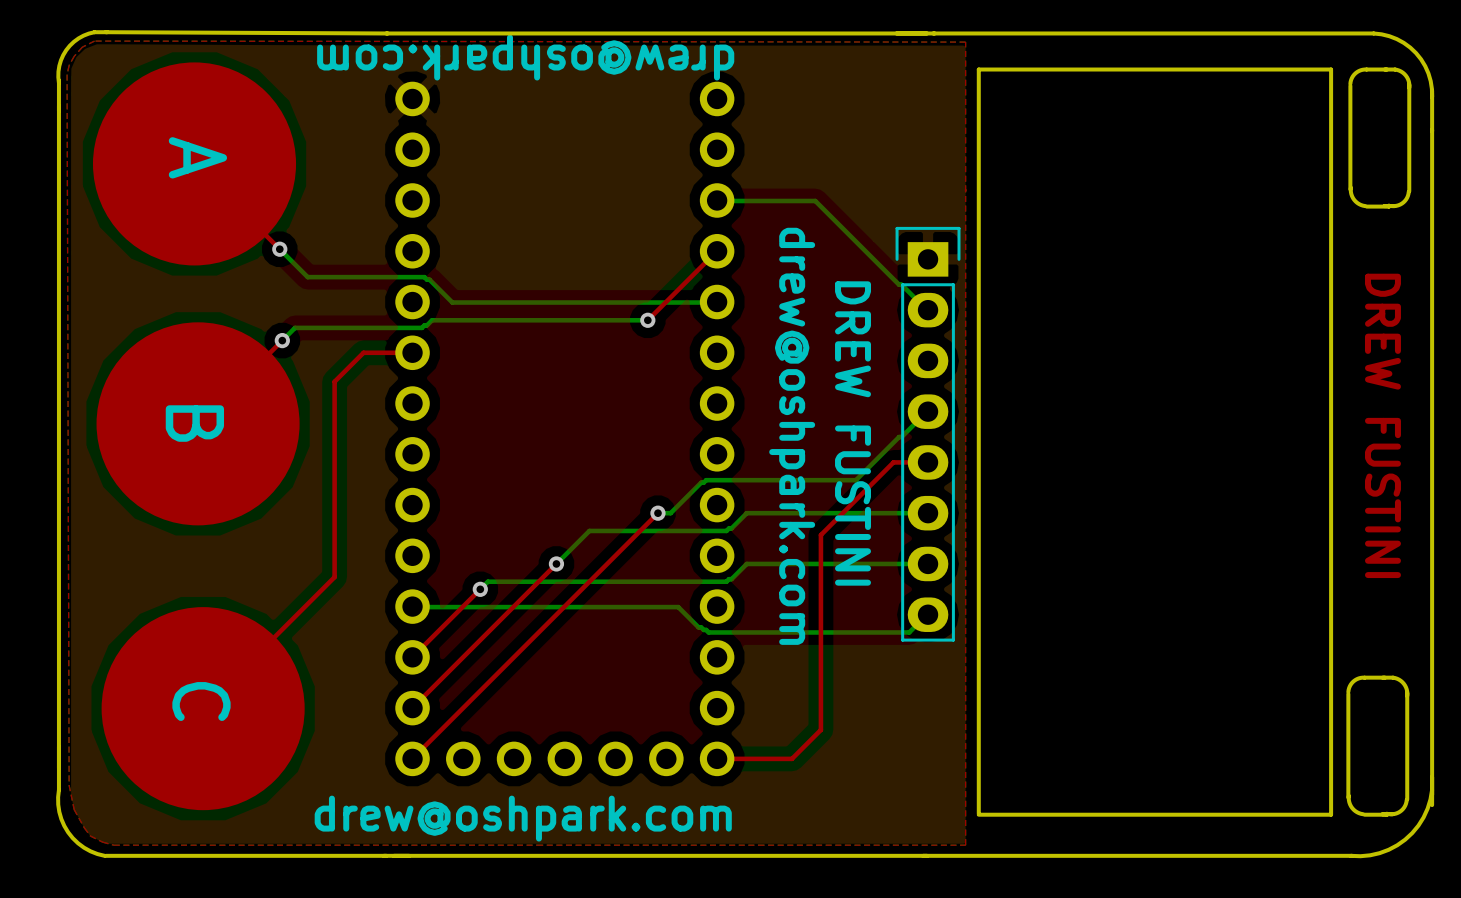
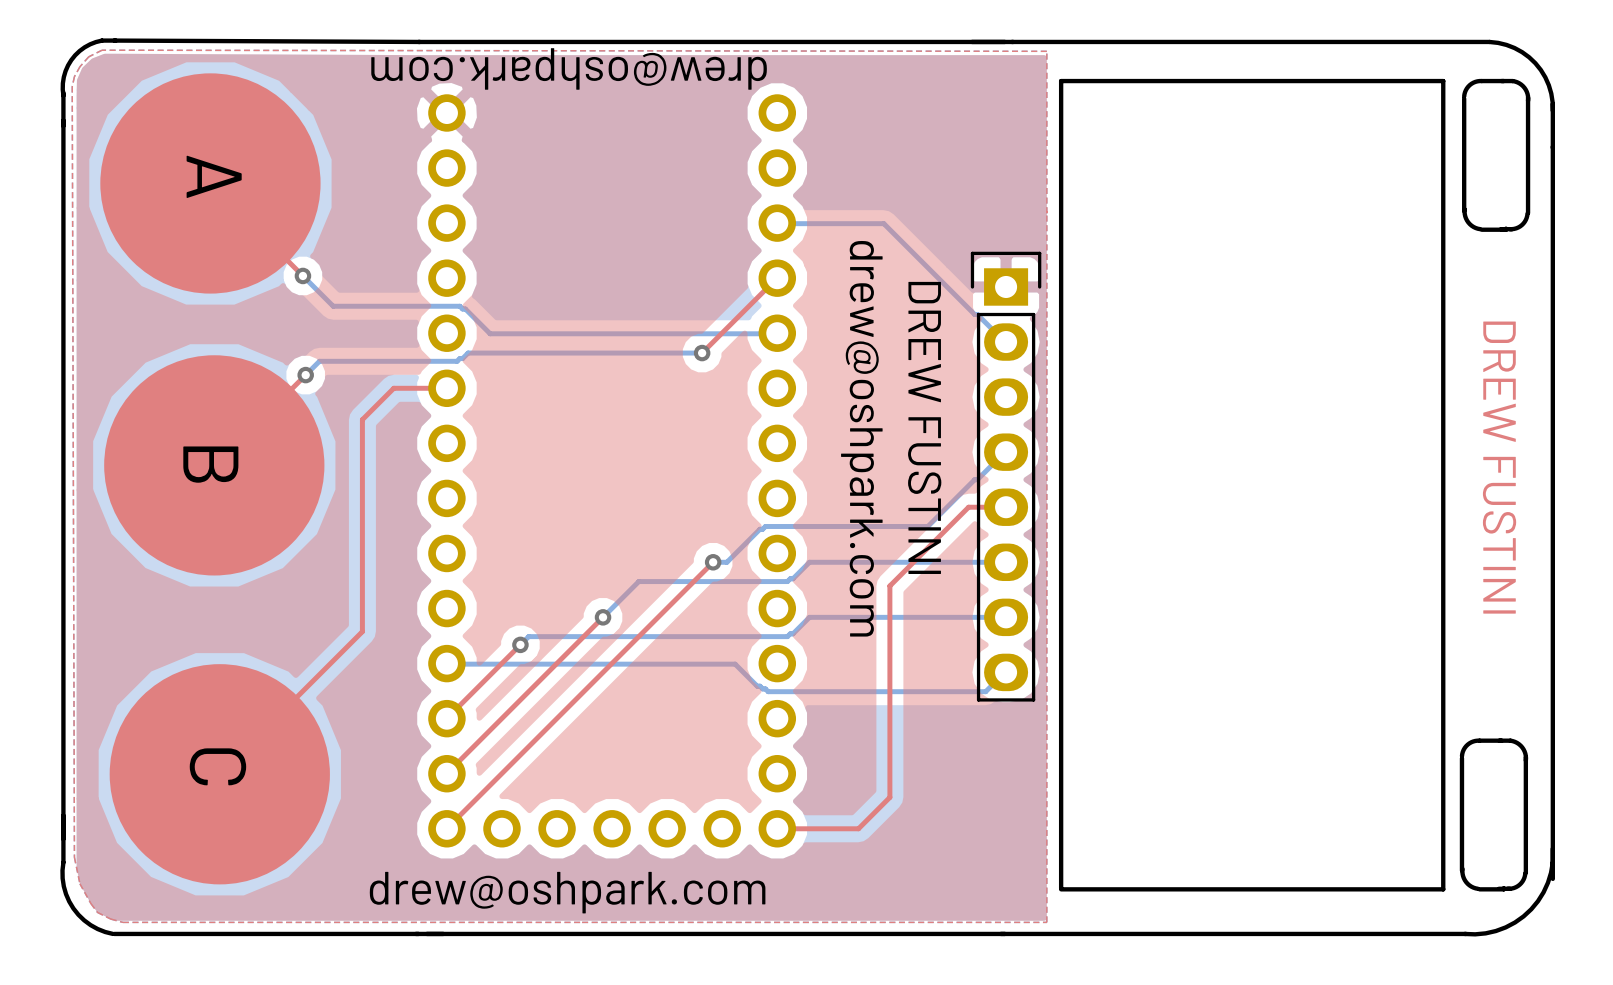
text position: DREW FUSTINI (853, 433) -> DREW FUSTINI (924, 427)
text position: drew@oshpark.com (792, 436) -> drew@oshpark.com (861, 438)

